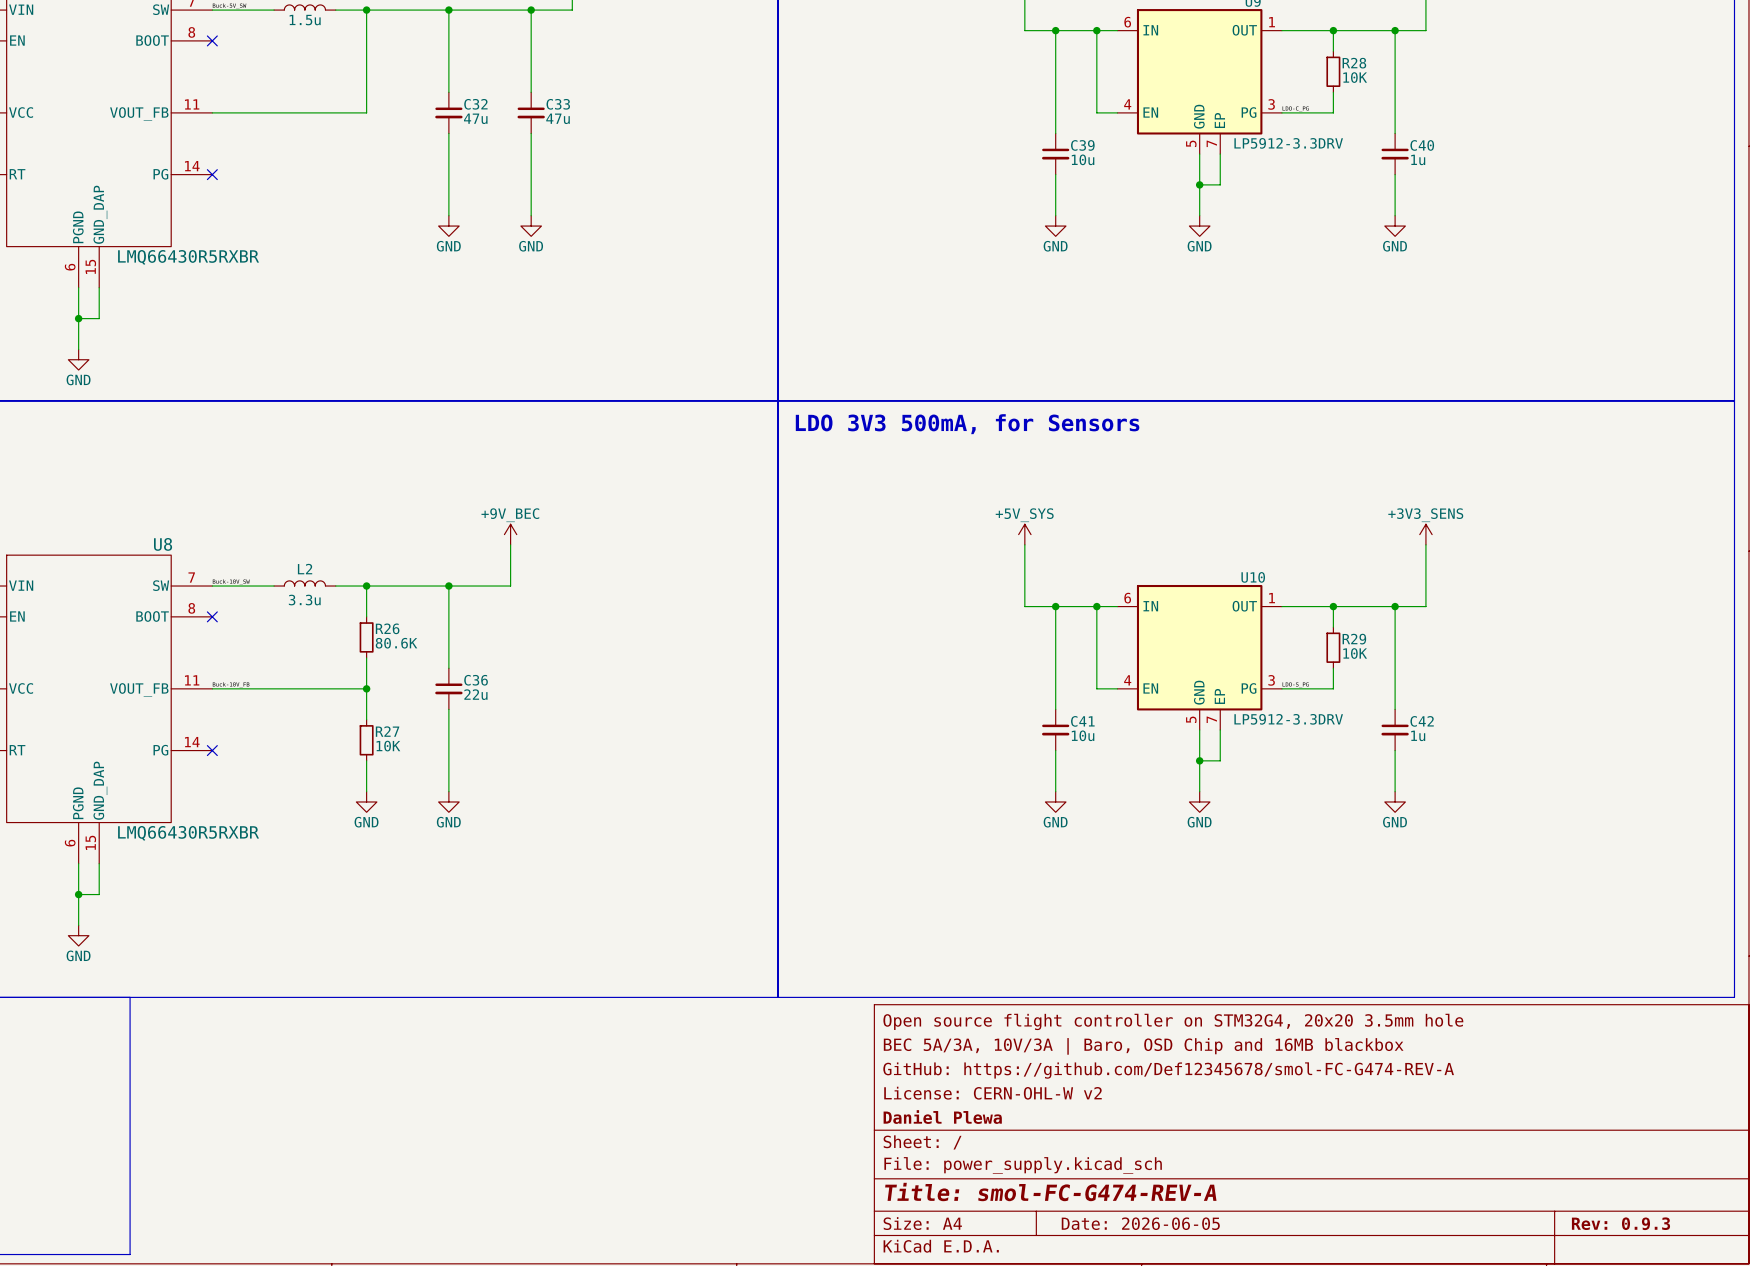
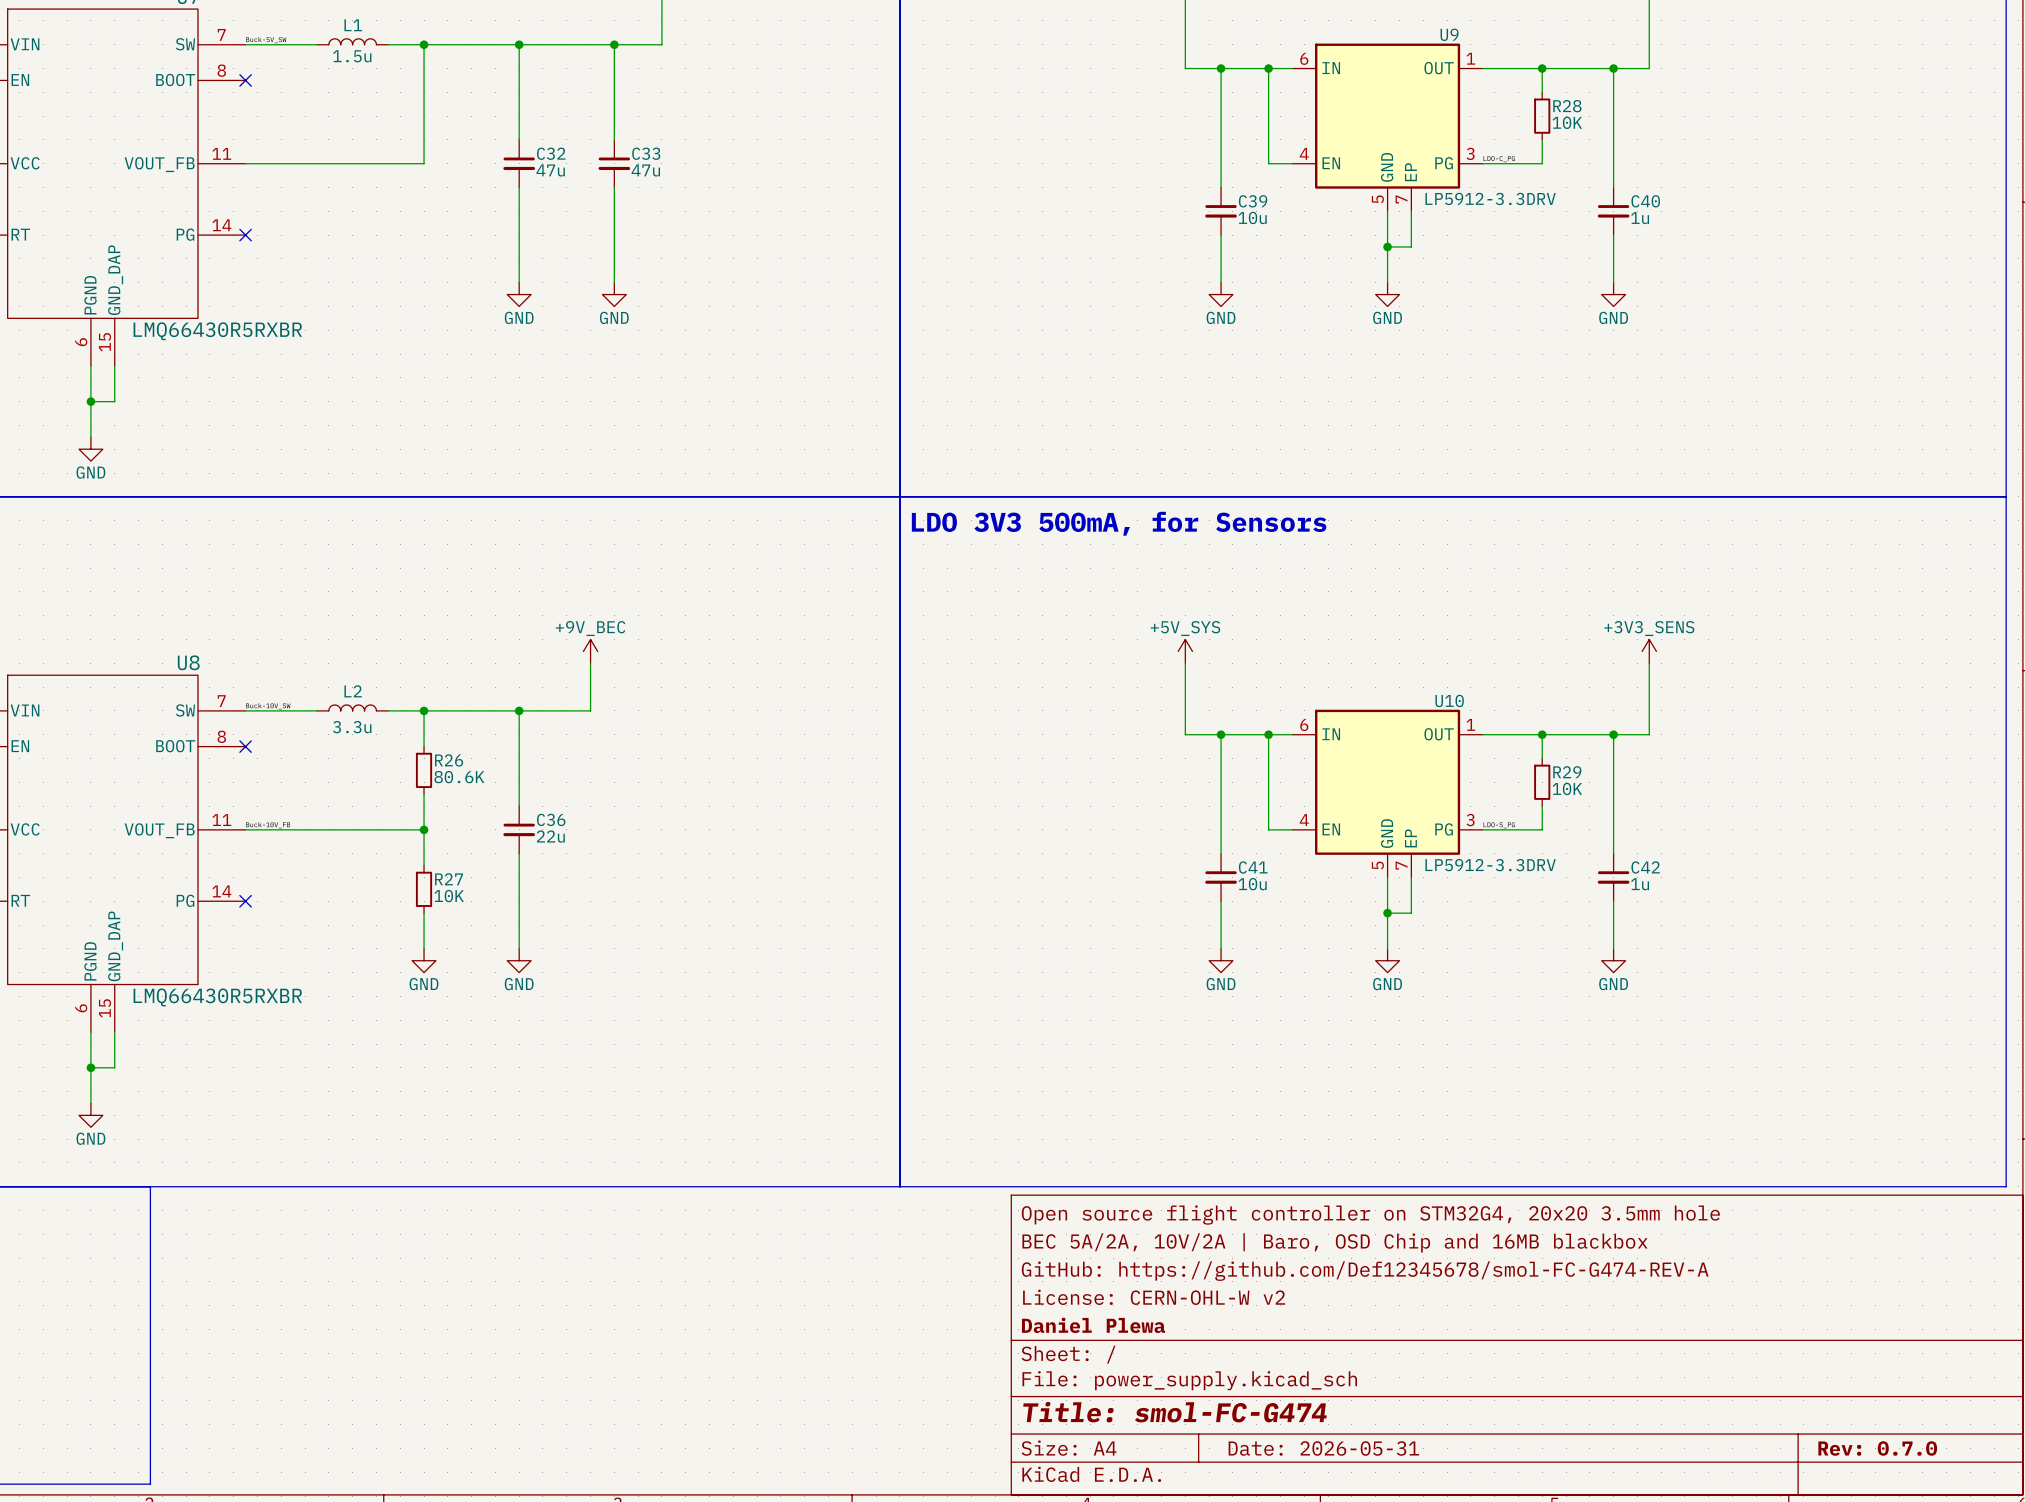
title block: BEC 5A/3A, 10V/3A | Baro, OSD Chip and 16MB blackbox (1143, 1046) -> BEC 5A/2A, 10V/2A | Baro, OSD Chip and 16MB blackbox (1334, 1242)
title block: Title: smol-FC-G474-REV-A (1050, 1192) -> Title: smol-FC-G474 (1175, 1412)
title block: Date: 2026-06-05 (1140, 1223) -> Date: 2026-05-31 (1323, 1448)
title block: Rev: 0.9.3 (1620, 1223) -> Rev: 0.7.0 (1877, 1448)

